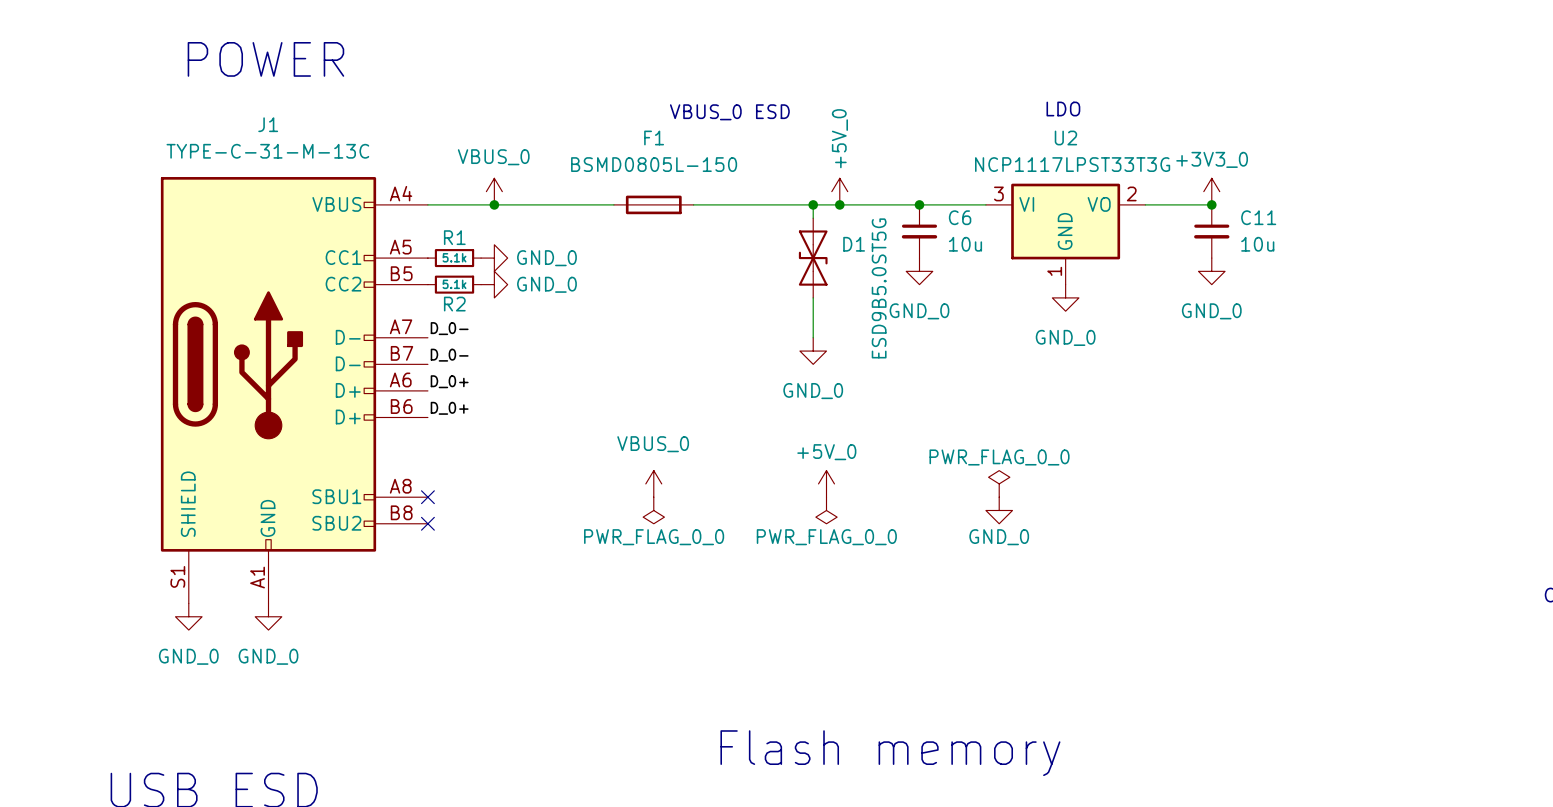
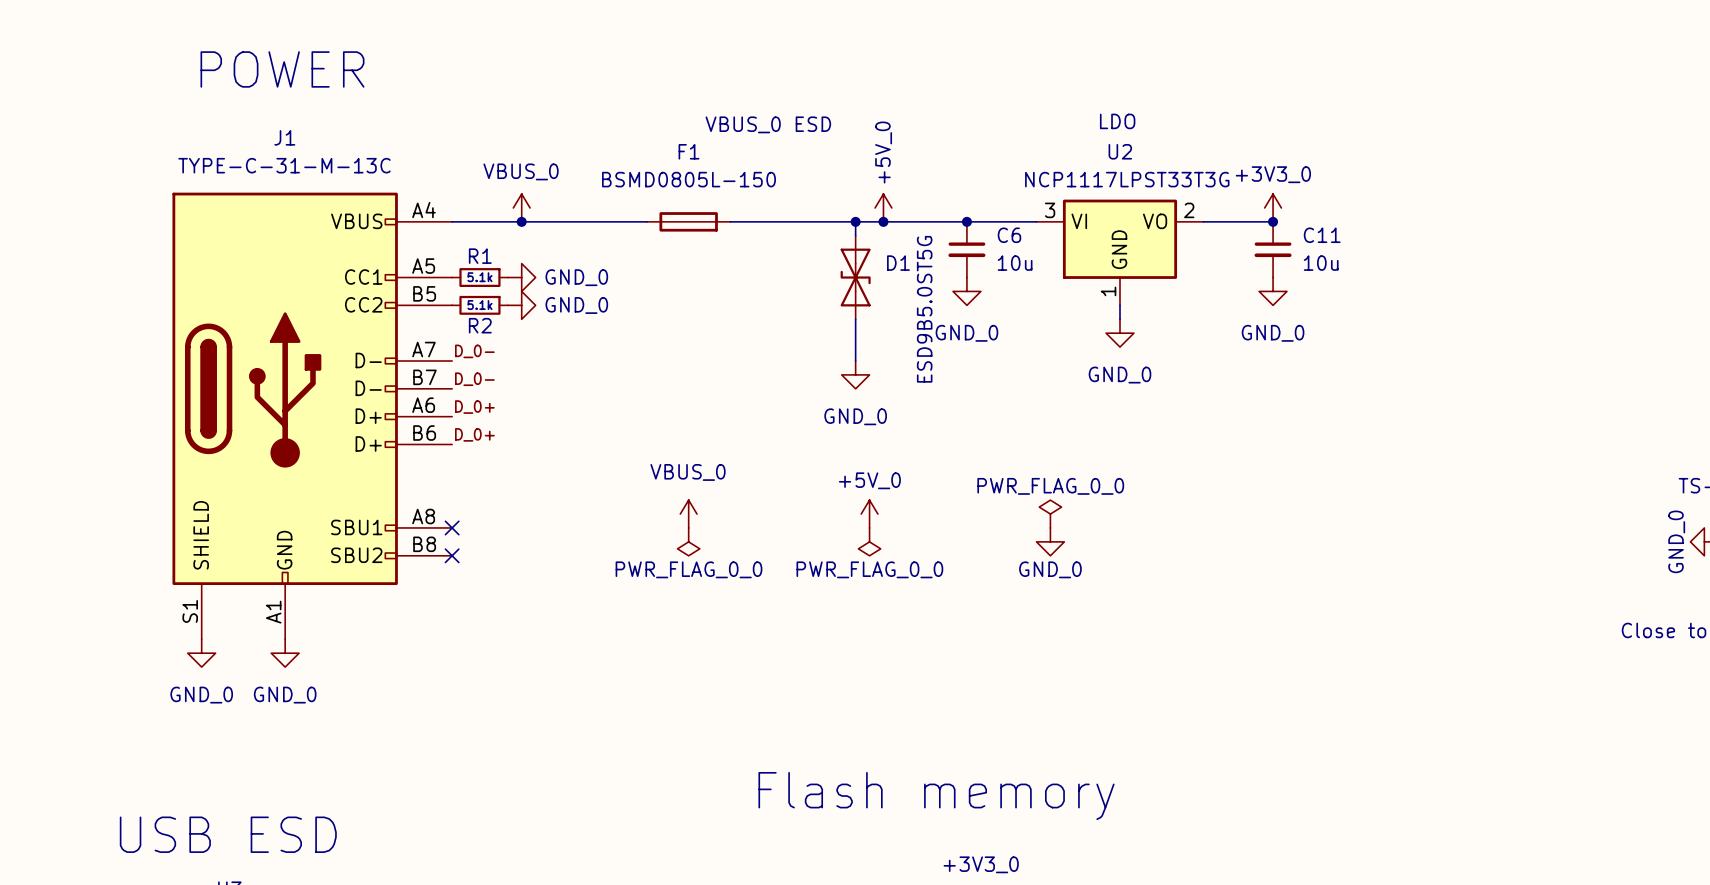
power symbol position: GND_0 (1065, 297) -> GND_0 (1119, 333)

